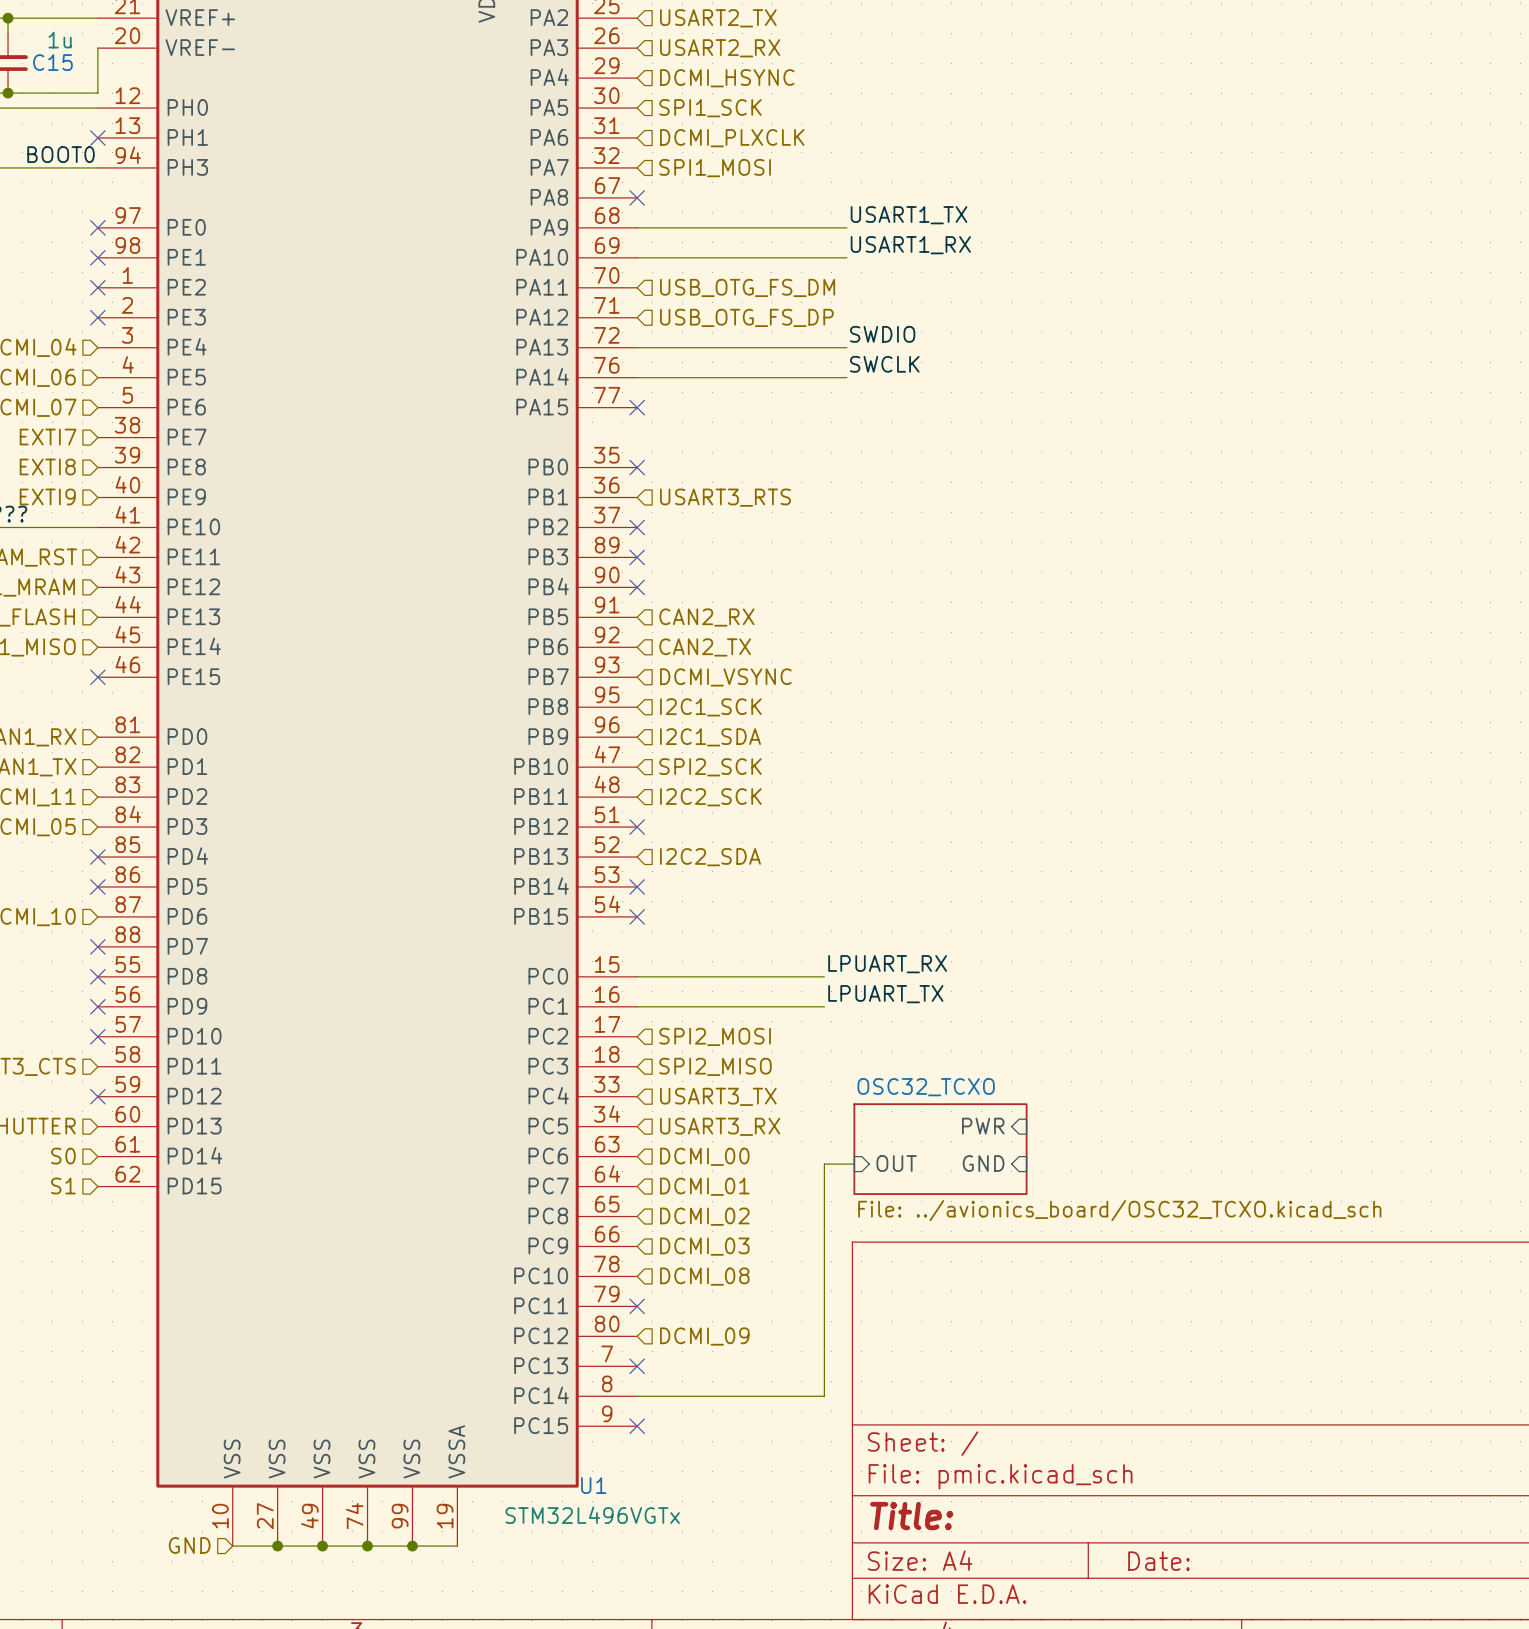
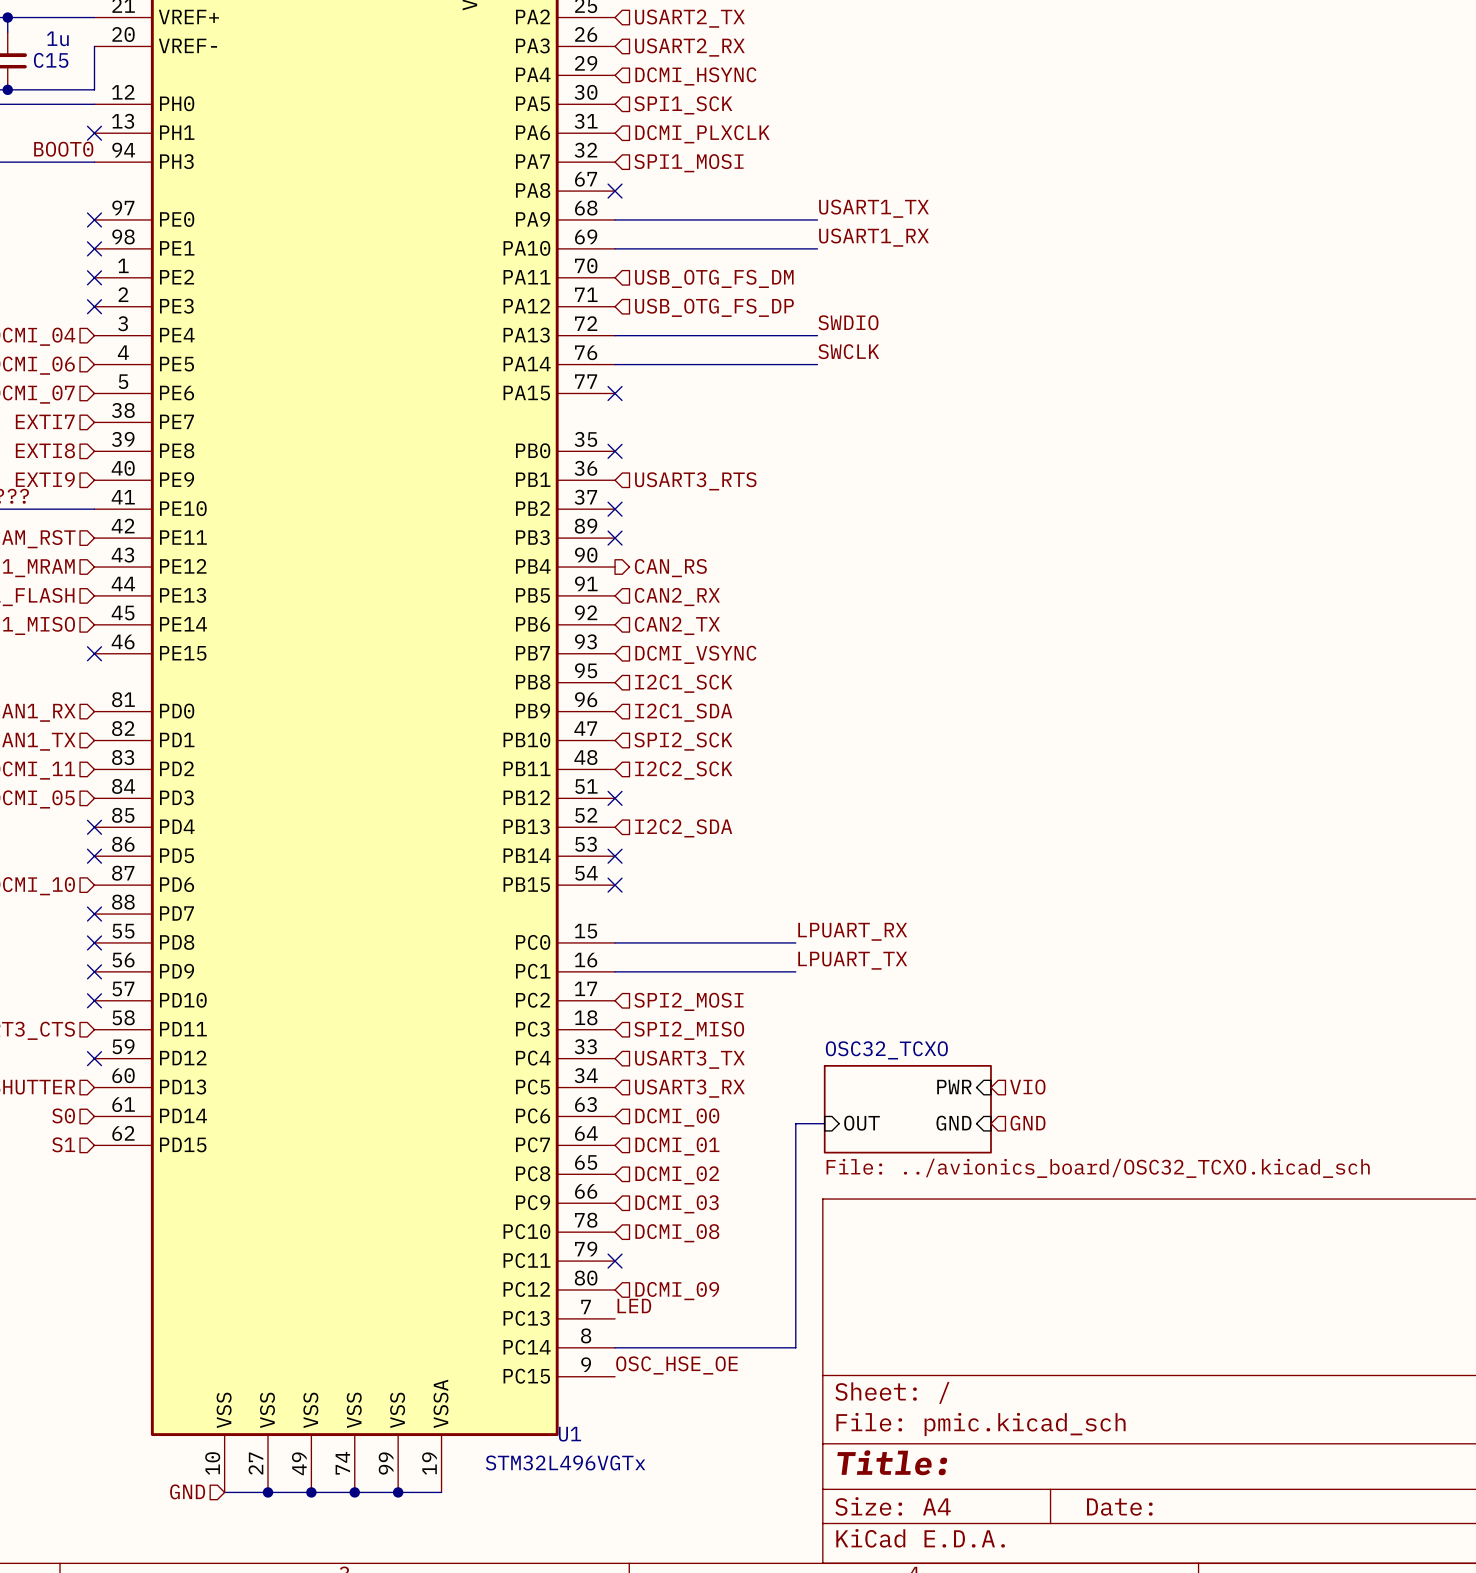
no-connect mark: (637, 587) -> none
hierarchical label: none -> CAN_RS (670, 568)
hierarchical label: none -> VIO (1027, 1087)
hierarchical label: none -> GND (1028, 1123)
label: none -> LED (634, 1306)
no-connect mark: (637, 1366) -> none
label: none -> OSC_HSE_OE (676, 1365)
no-connect mark: (637, 1426) -> none

